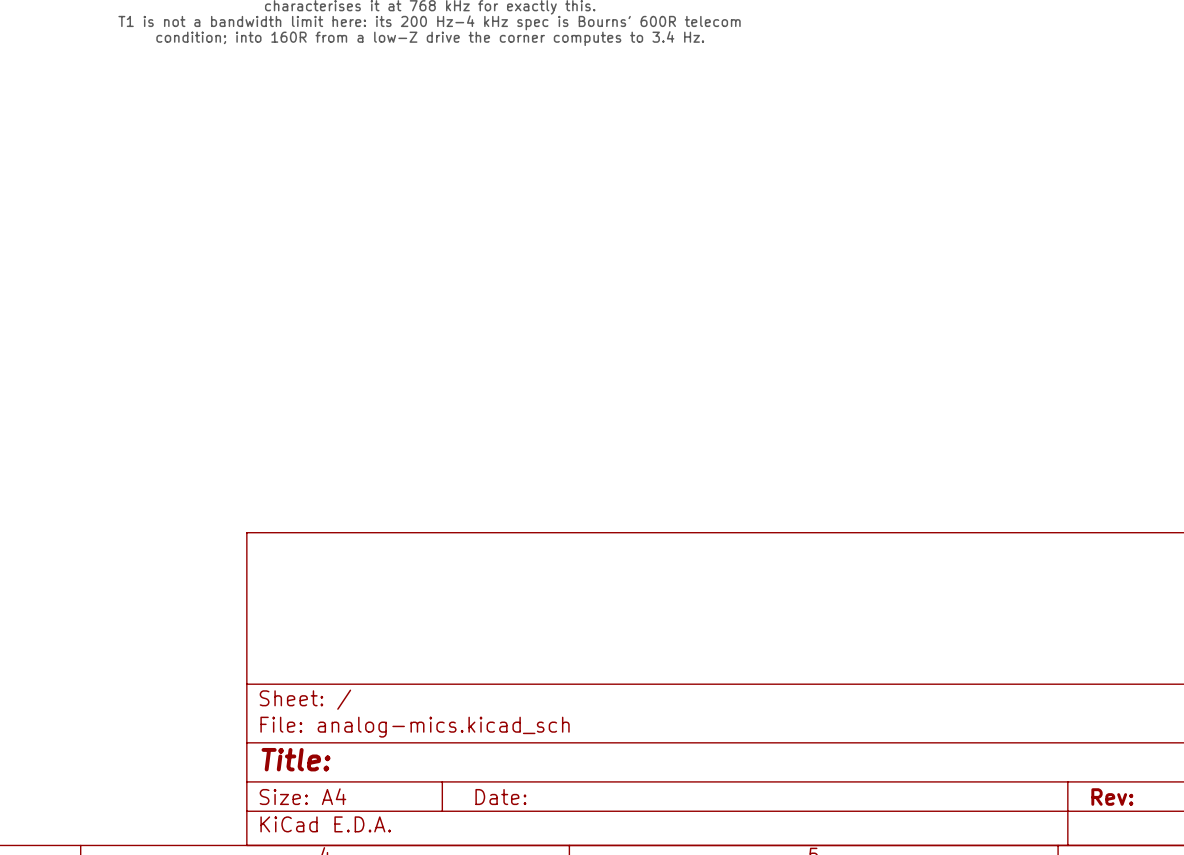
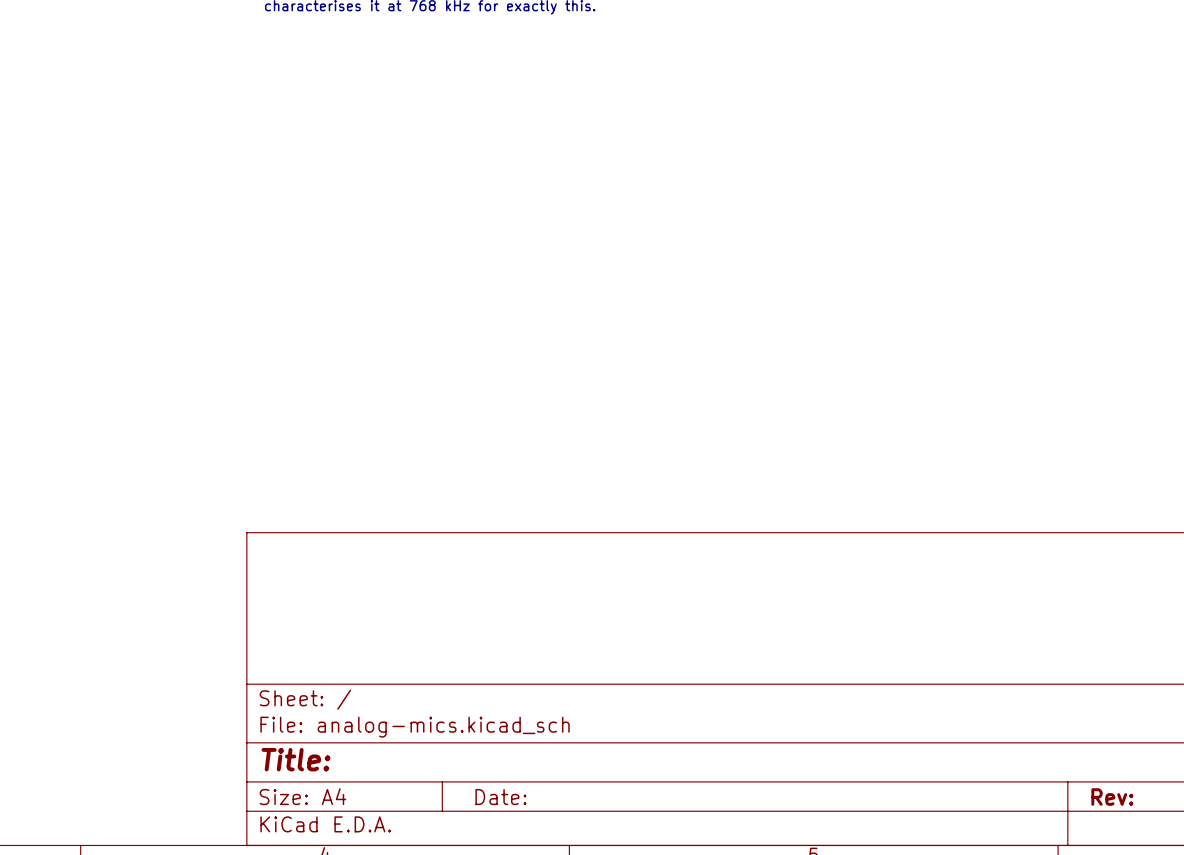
text: T1 is not a bandwidth limit here: its 200 Hz-4 kHz spec is Bourns' 600R telecom (429, 22) -> none
text: condition; into 160R from a low-Z drive the corner computes to 3.4 Hz. (430, 38) -> none

